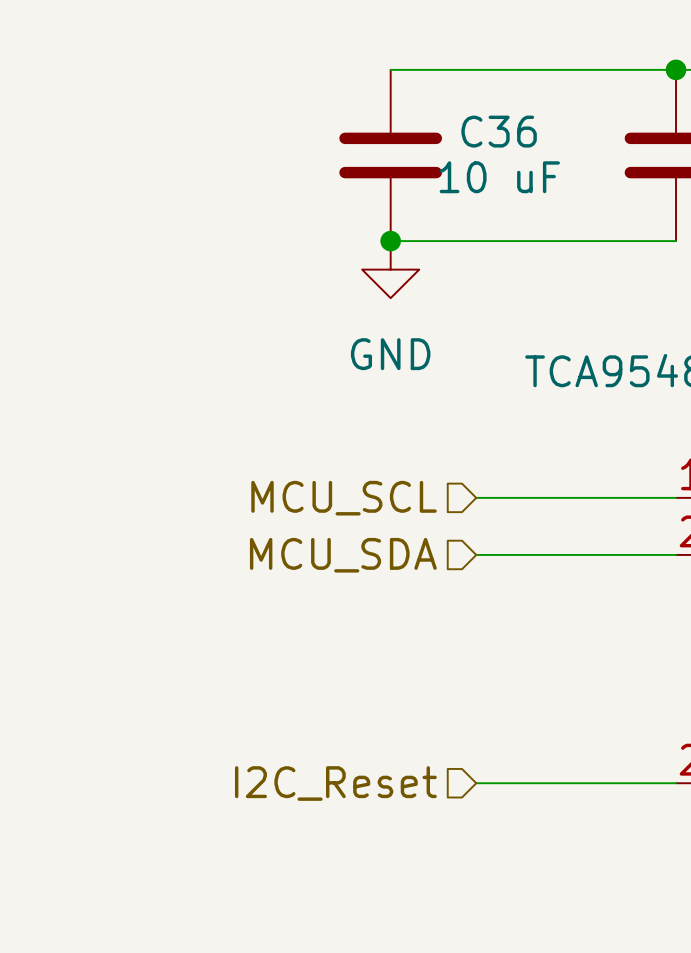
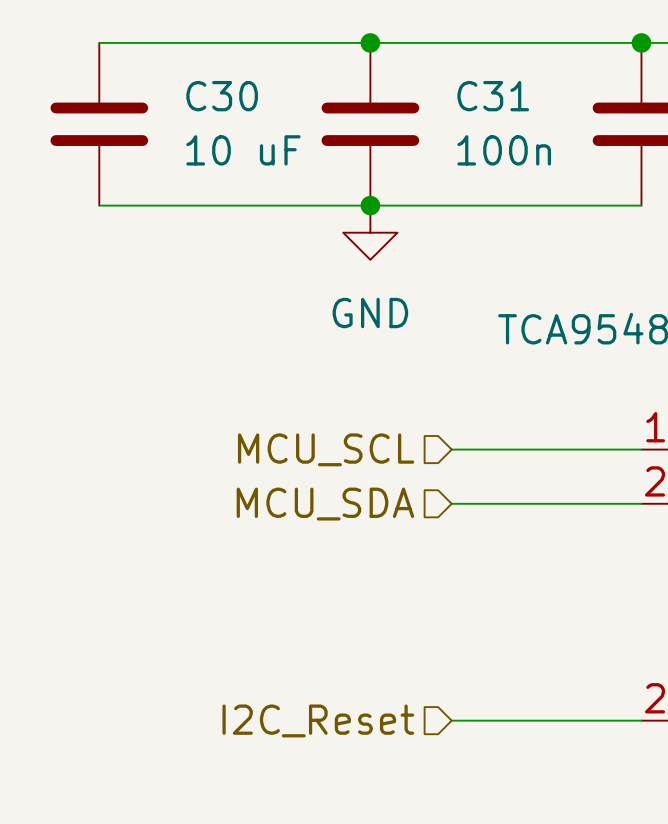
wire: none -> (99, 42) (370, 42)
junction: none -> (370, 42)
C36 name: C36 (499, 131) -> C31 (493, 96)
C30: none -> 10 uF (99, 124)
C36 value: 10 uF (499, 177) -> 100n (504, 150)
wire: none -> (99, 205) (370, 205)

